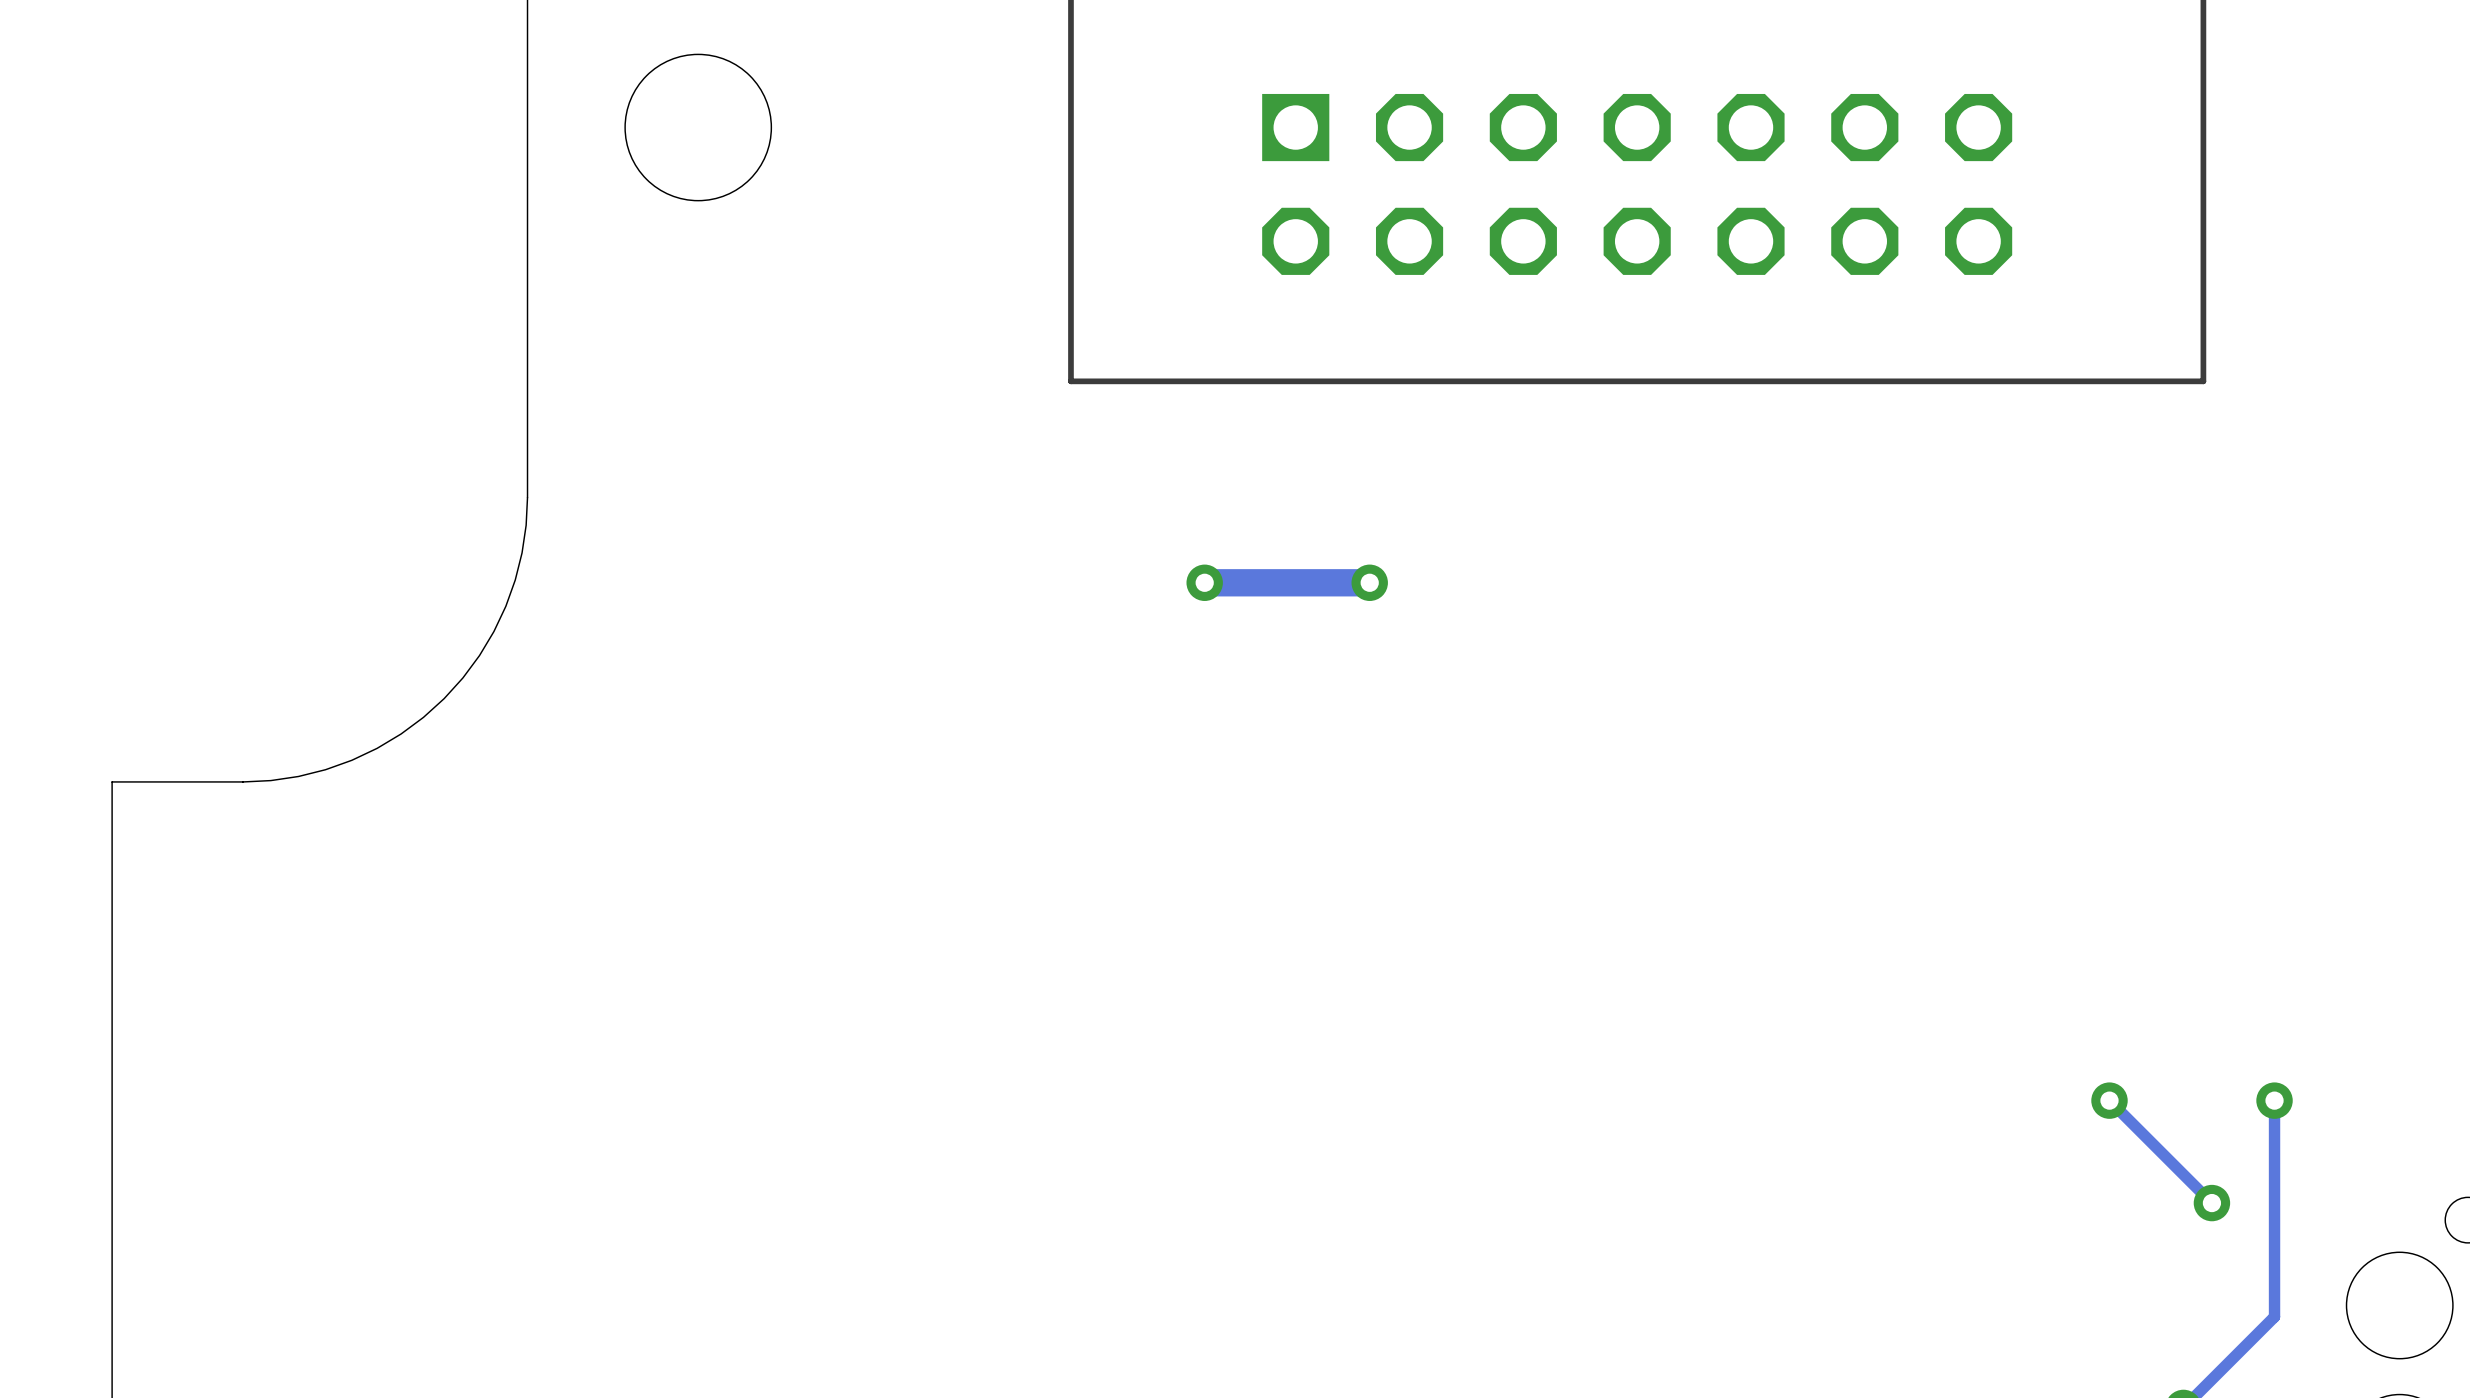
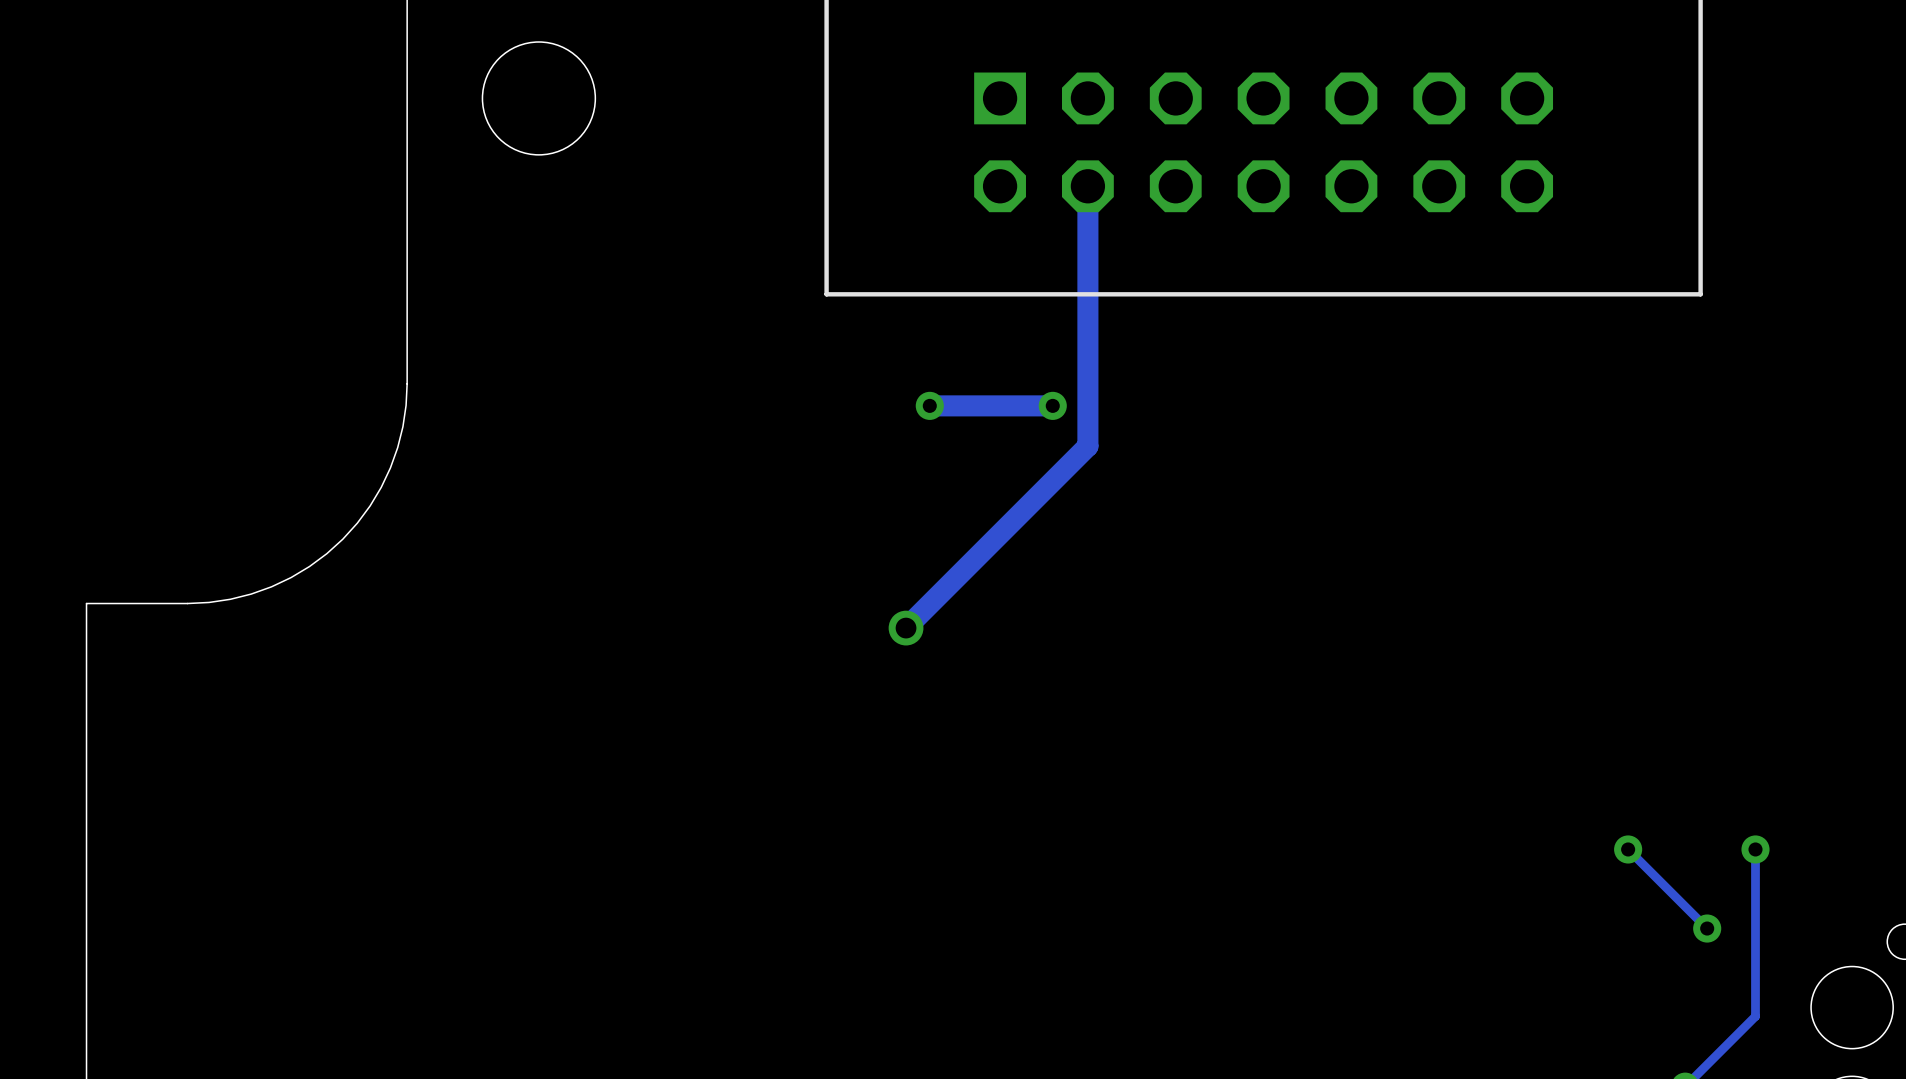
track: none -> (1087, 186) (1087, 446) (906, 628)
track: none -> (1052, 405) (929, 405)
via position: (1204, 582) -> (929, 405)
track: (1369, 582) (1204, 582) -> none
via position: (1369, 582) -> (1052, 405)
via: none -> (906, 628)

